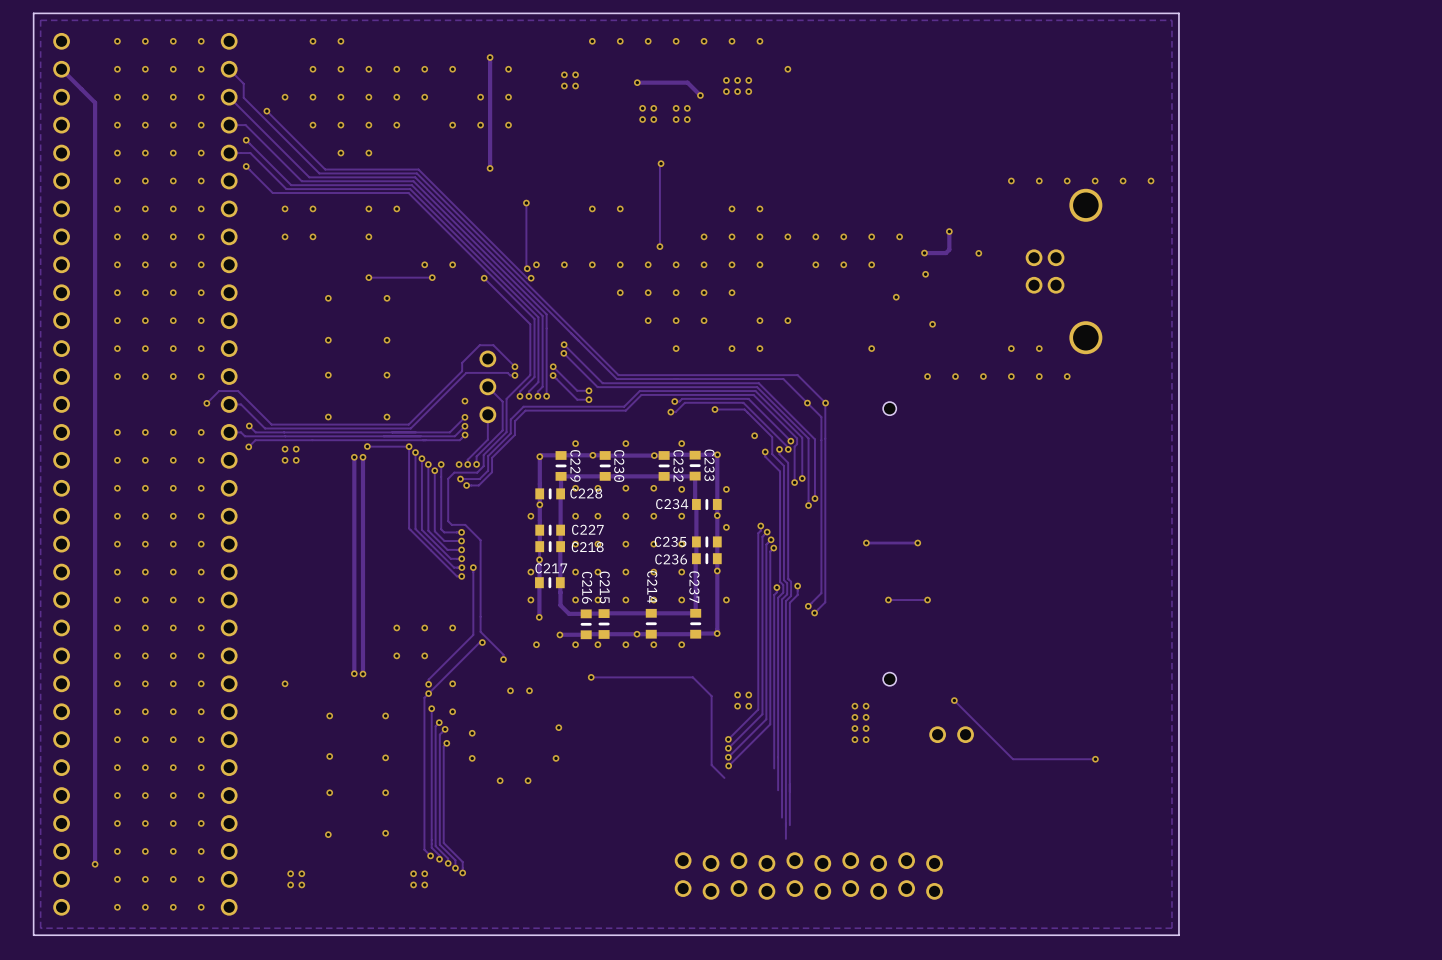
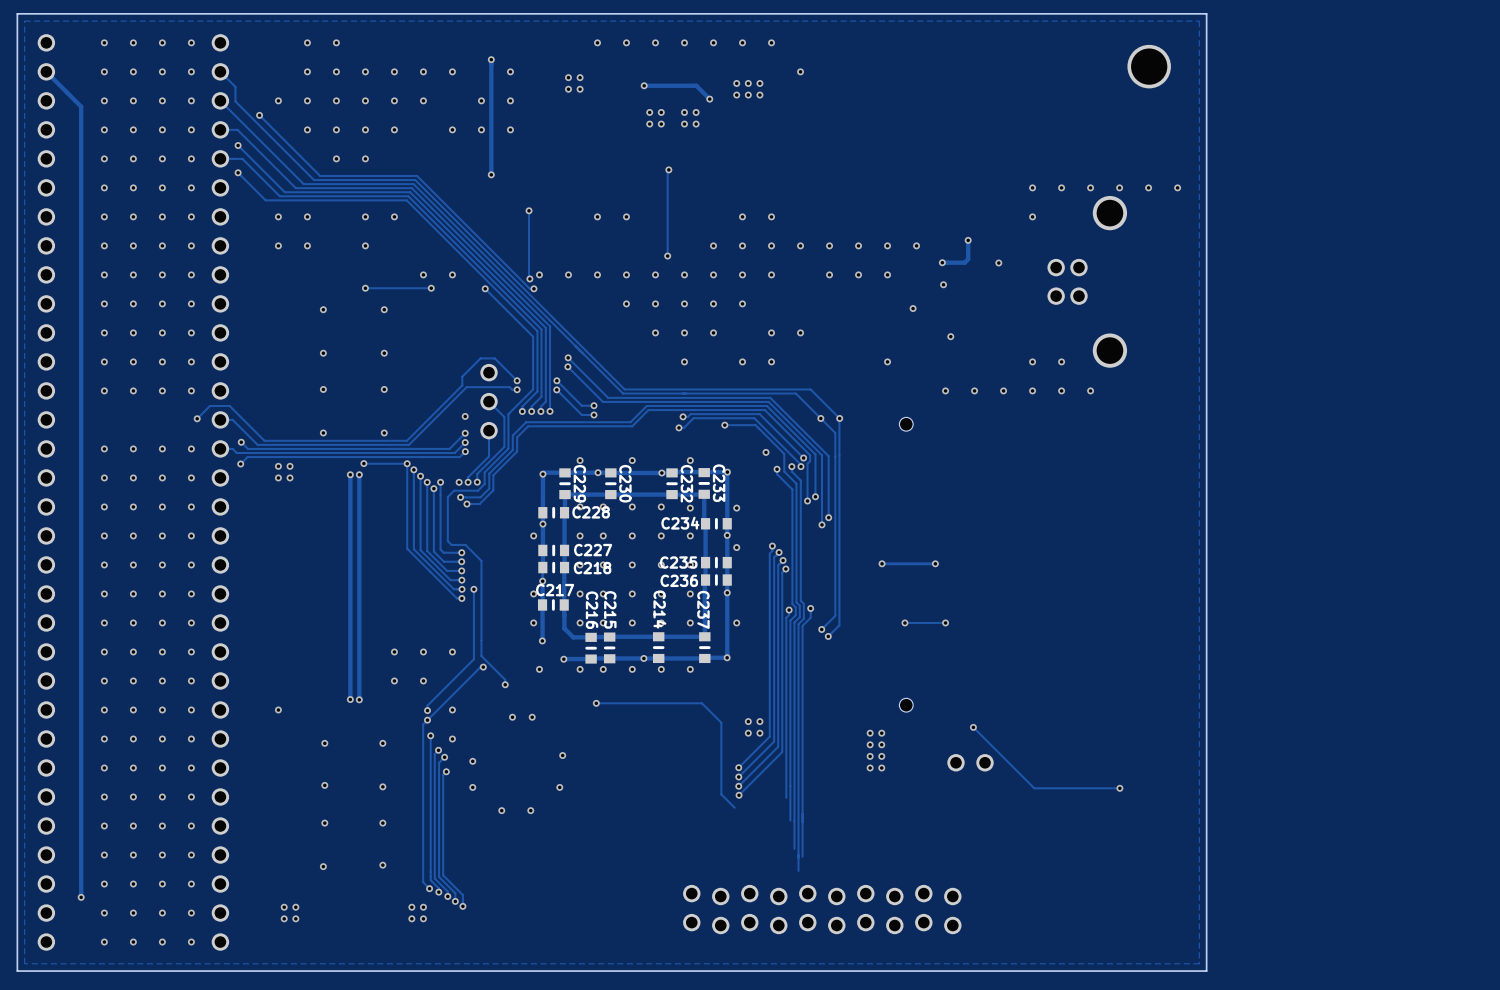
part: none -> (1149, 66)
via: none -> (1032, 216)

